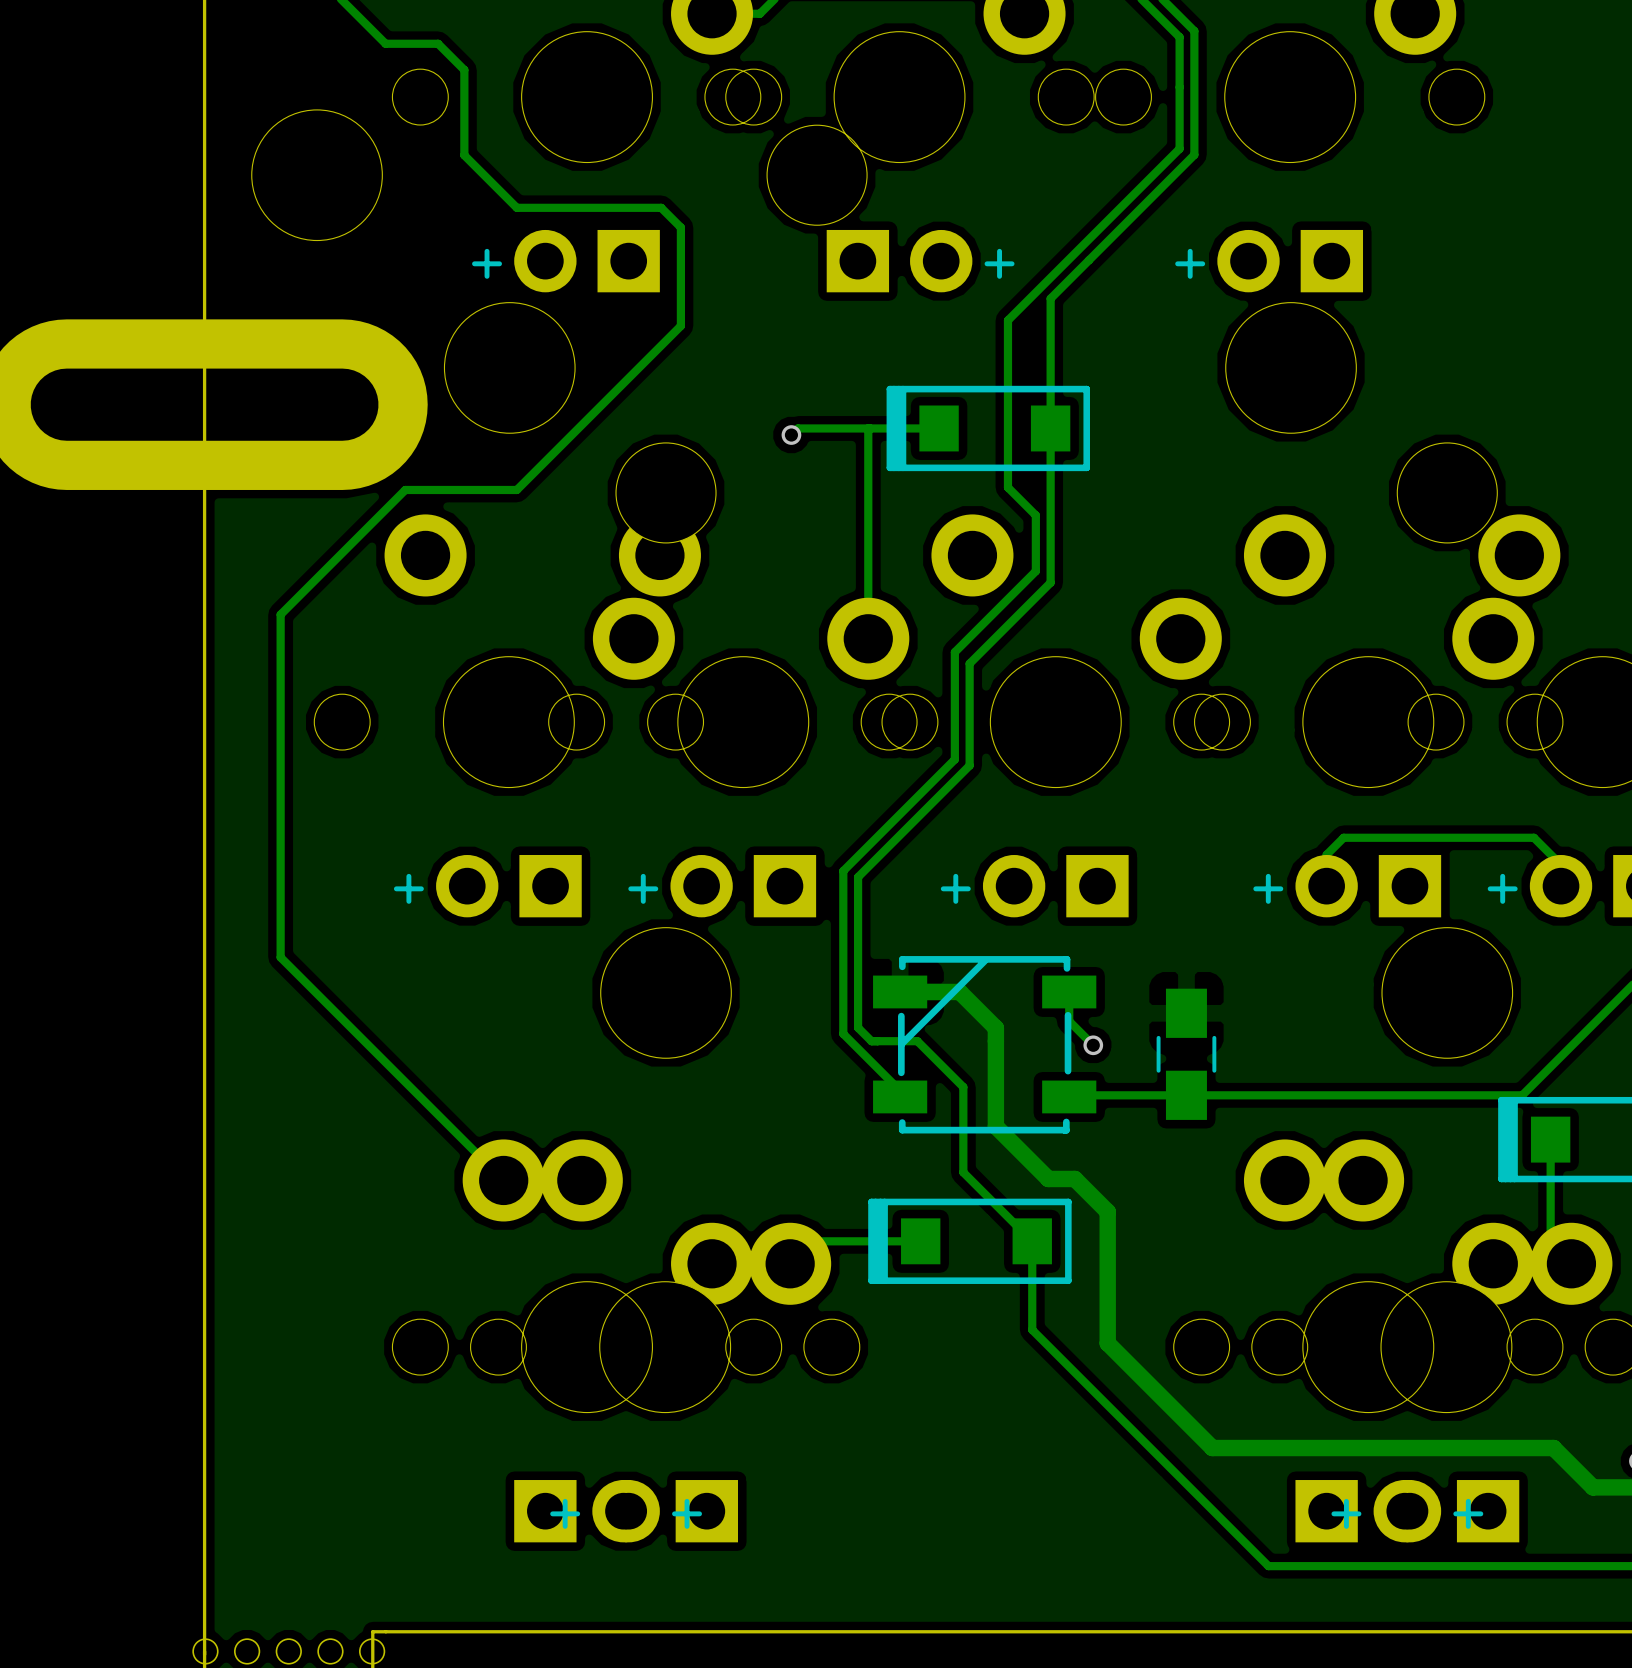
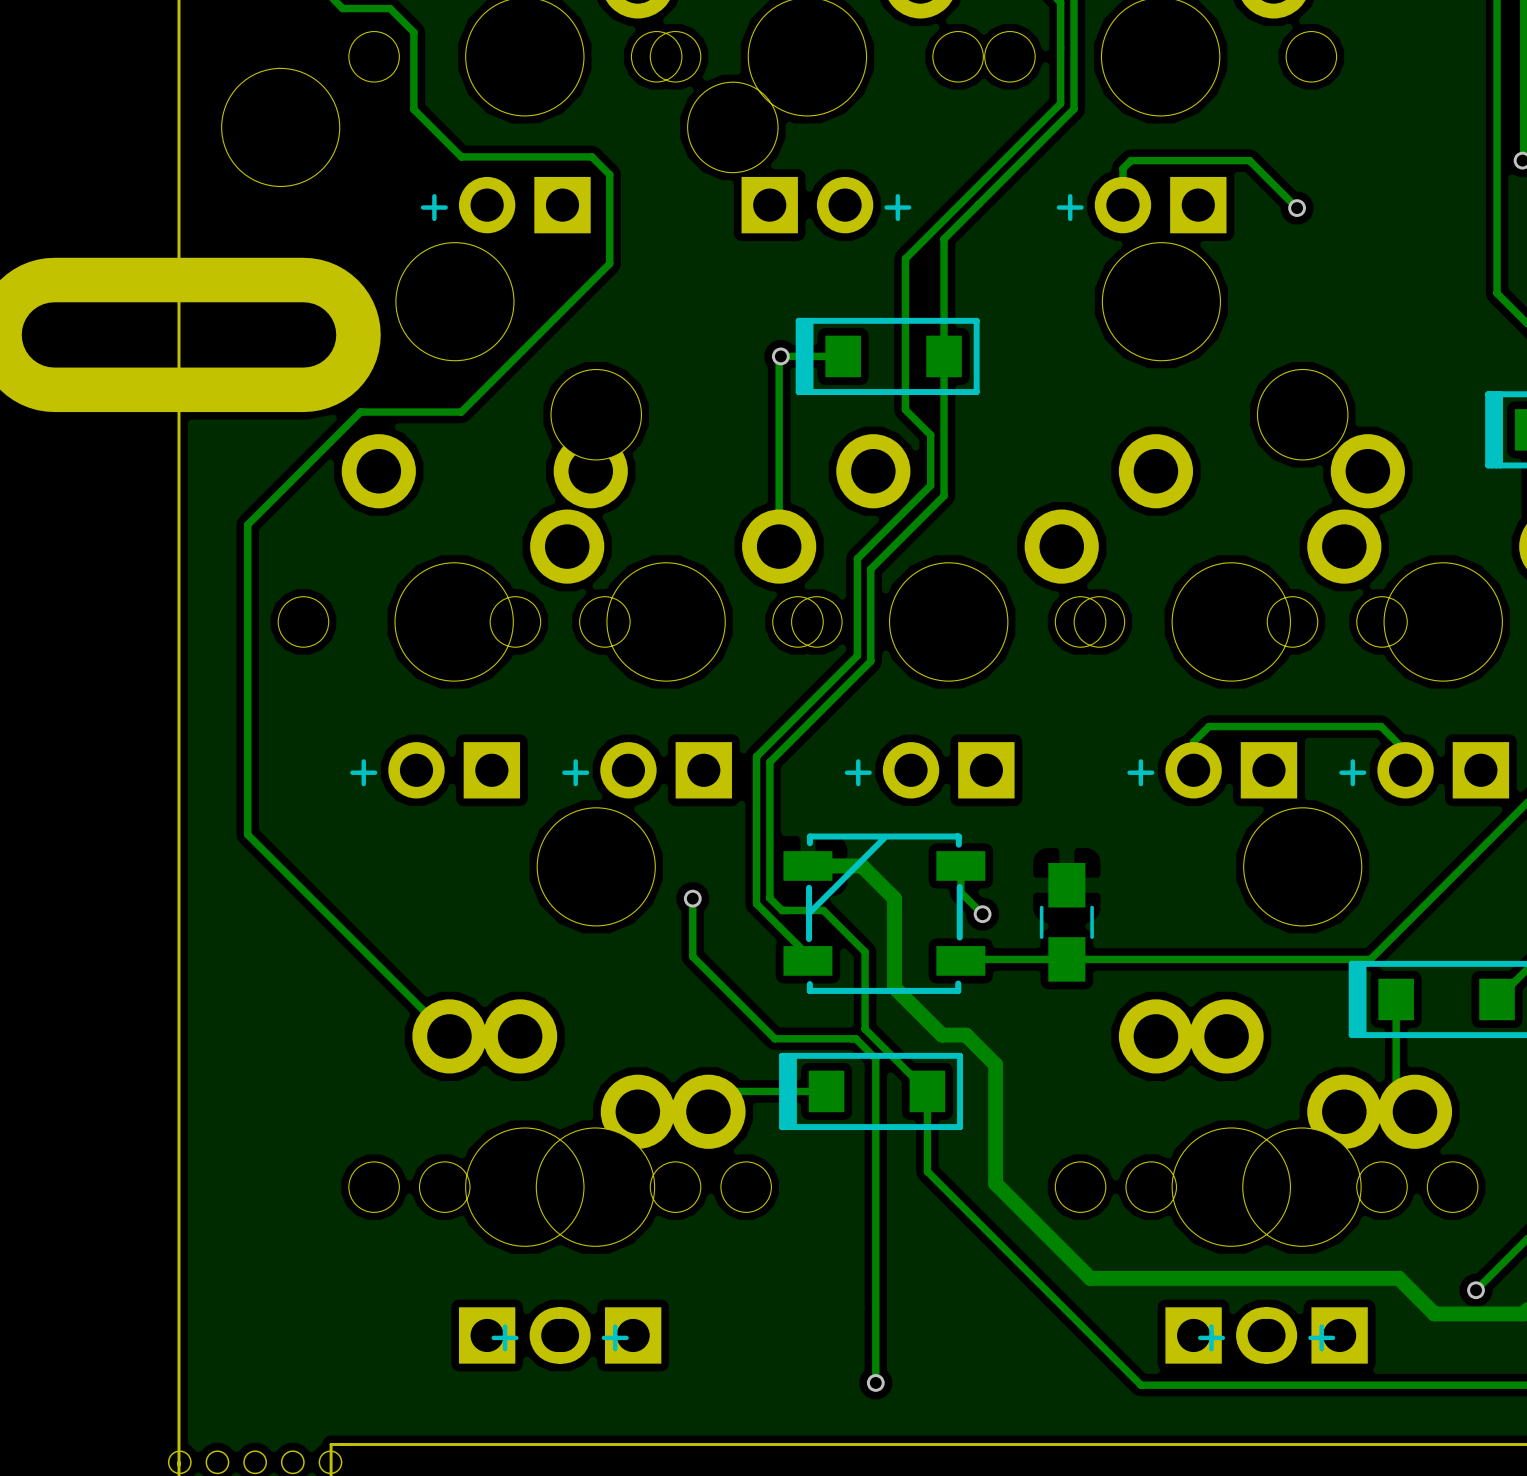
track: none -> (1122, 205) (1122, 168) (1130, 160) (1249, 160) (1297, 208)
via: none -> (1297, 208)
track: (868, 428) (797, 428) (791, 435) -> none
via position: (791, 435) -> (780, 356)
track: none -> (692, 898) (692, 956) (774, 1038) (855, 1038) (875, 1058) (875, 1382)
via: none -> (692, 898)
via: none -> (875, 1382)

